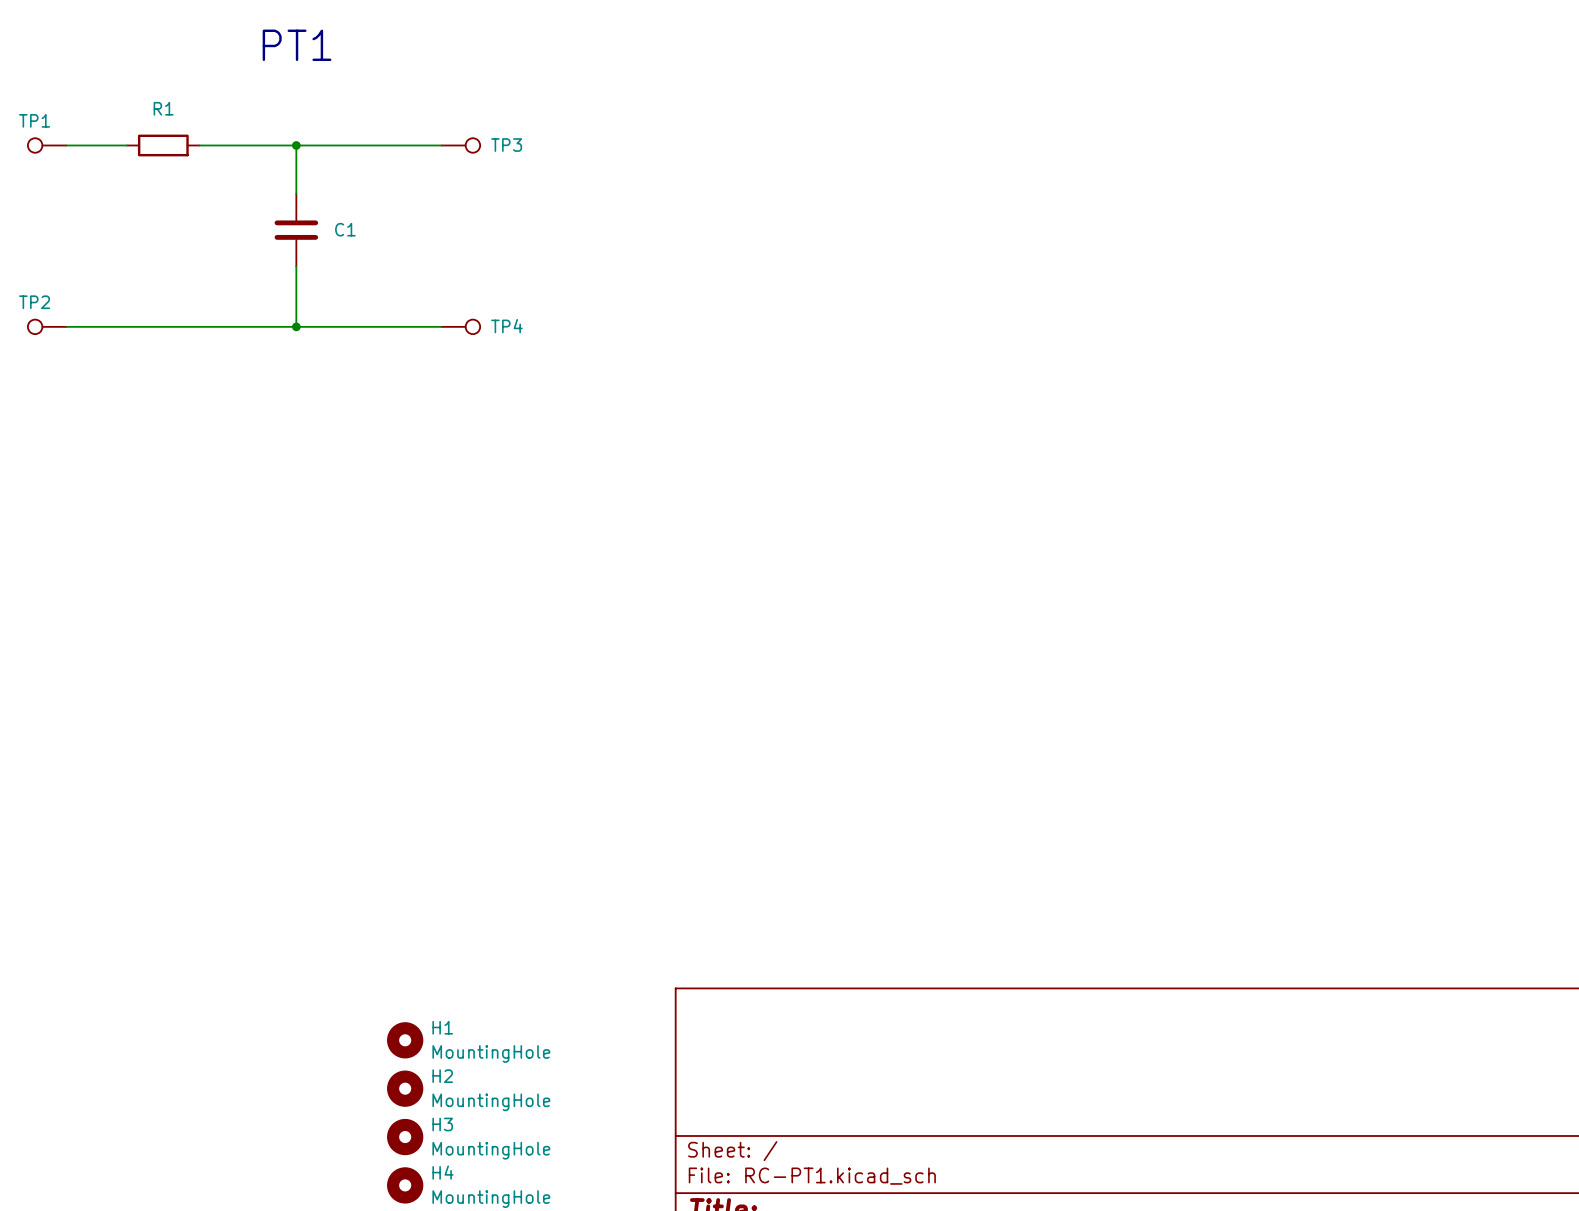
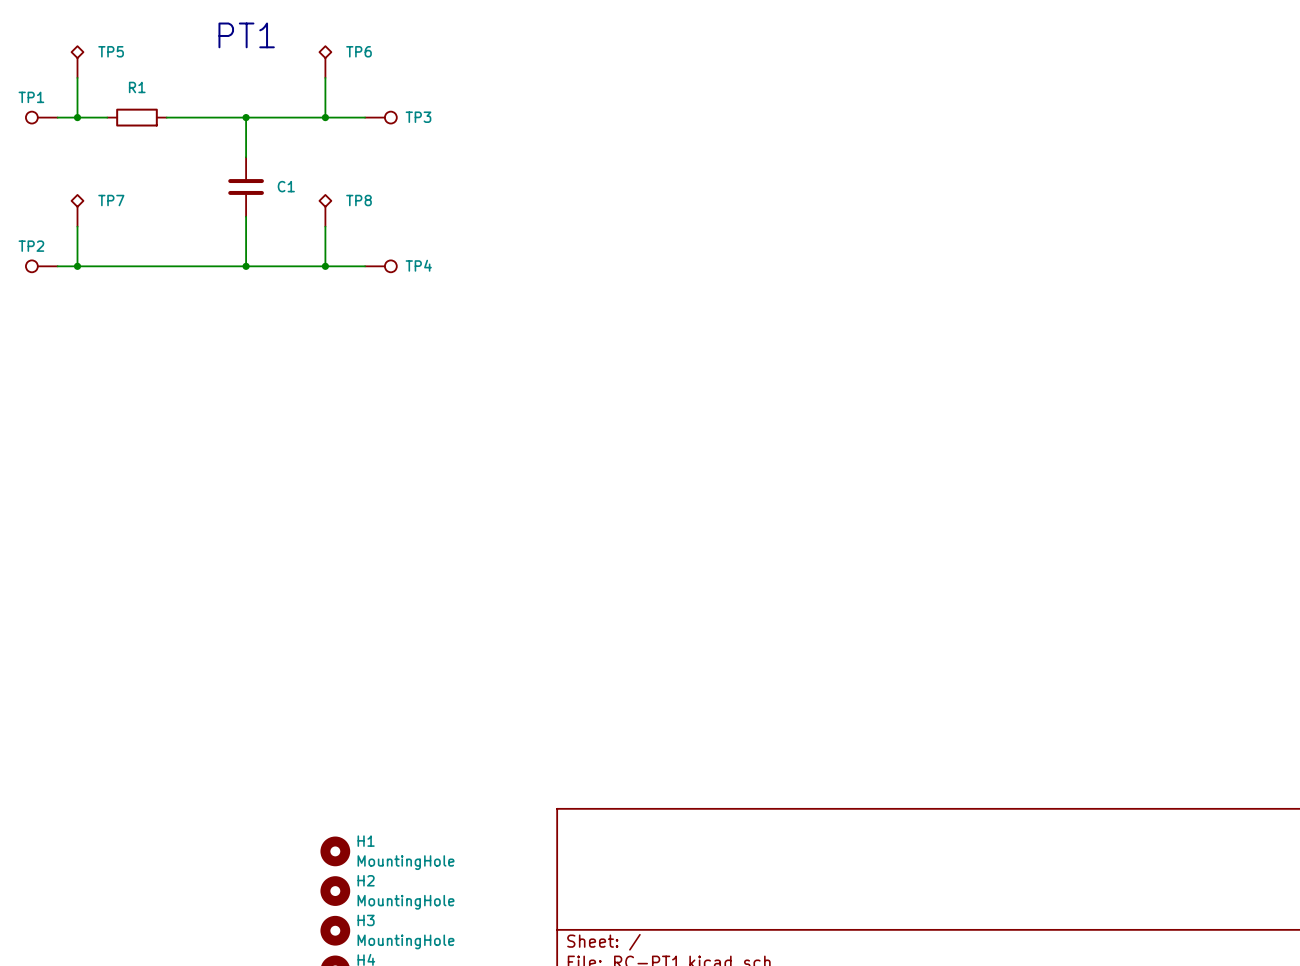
TP5: none -> (77, 62)
TP6: none -> (325, 62)
wire: none -> (77, 77) (77, 117)
wire: none -> (325, 77) (325, 117)
junction: none -> (77, 117)
junction: none -> (325, 117)
TP7: none -> (77, 210)
TP8: none -> (325, 210)
wire: none -> (77, 226) (77, 266)
wire: none -> (325, 226) (325, 266)
junction: none -> (77, 266)
junction: none -> (325, 266)

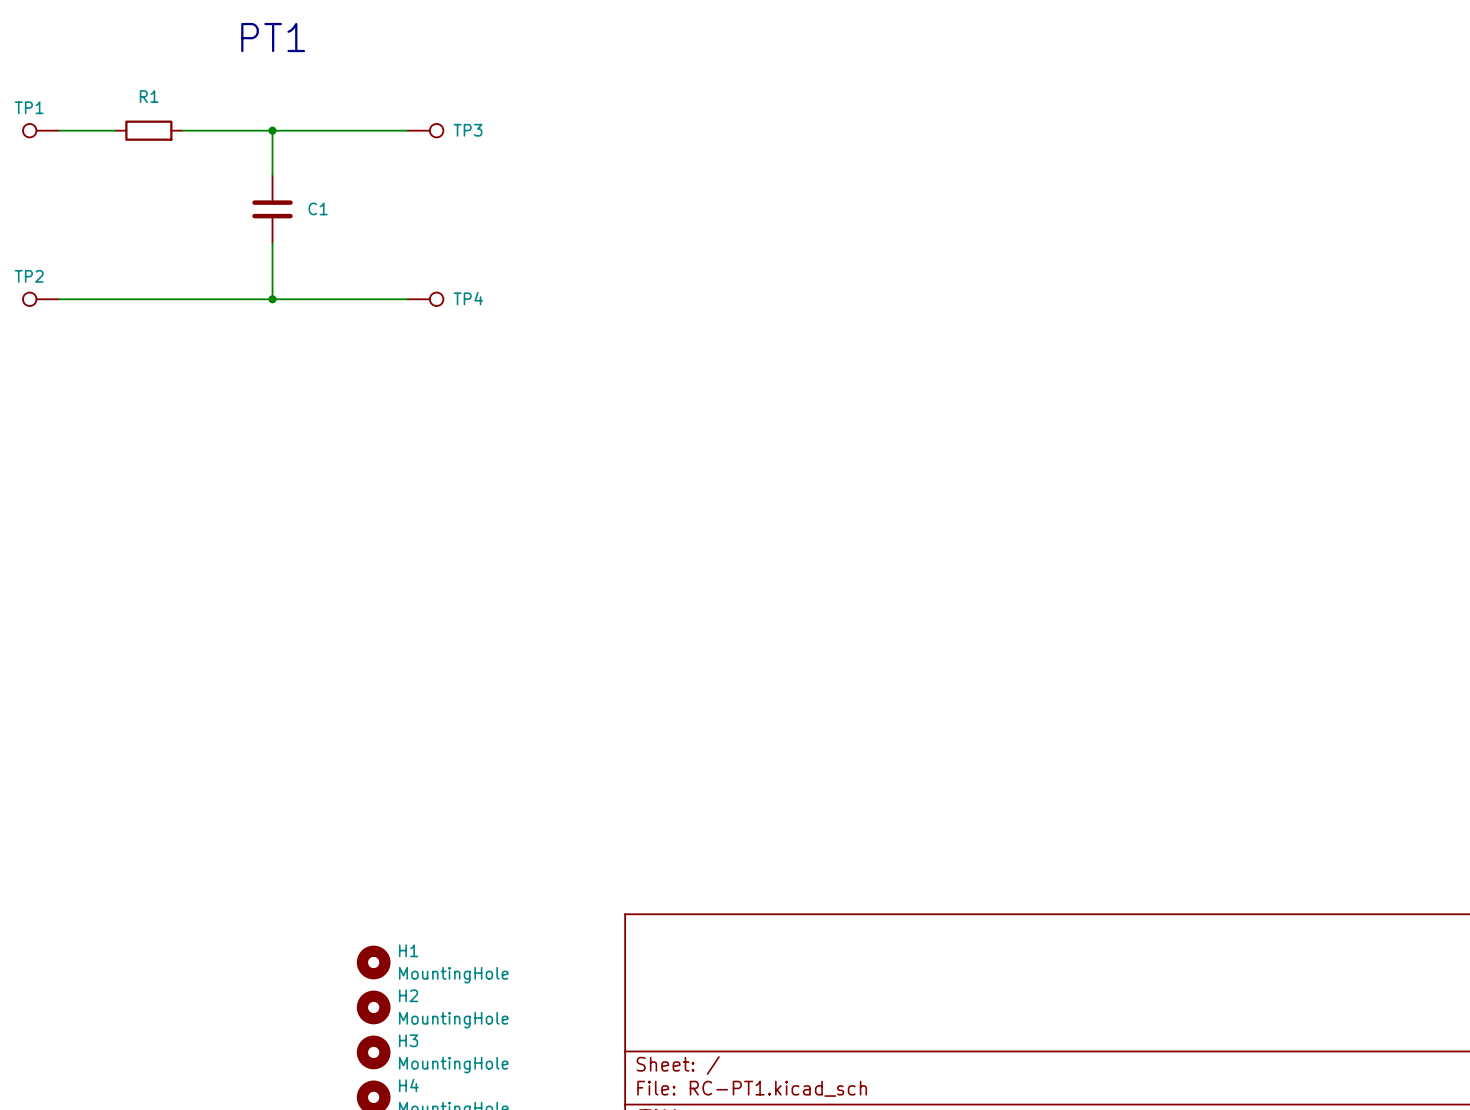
TP5: (77, 62) -> none
TP6: (325, 62) -> none
wire: (77, 77) (77, 117) -> none
wire: (325, 77) (325, 117) -> none
junction: (77, 117) -> none
junction: (325, 117) -> none
TP7: (77, 210) -> none
TP8: (325, 210) -> none
wire: (77, 226) (77, 266) -> none
wire: (325, 226) (325, 266) -> none
junction: (77, 266) -> none
junction: (325, 266) -> none

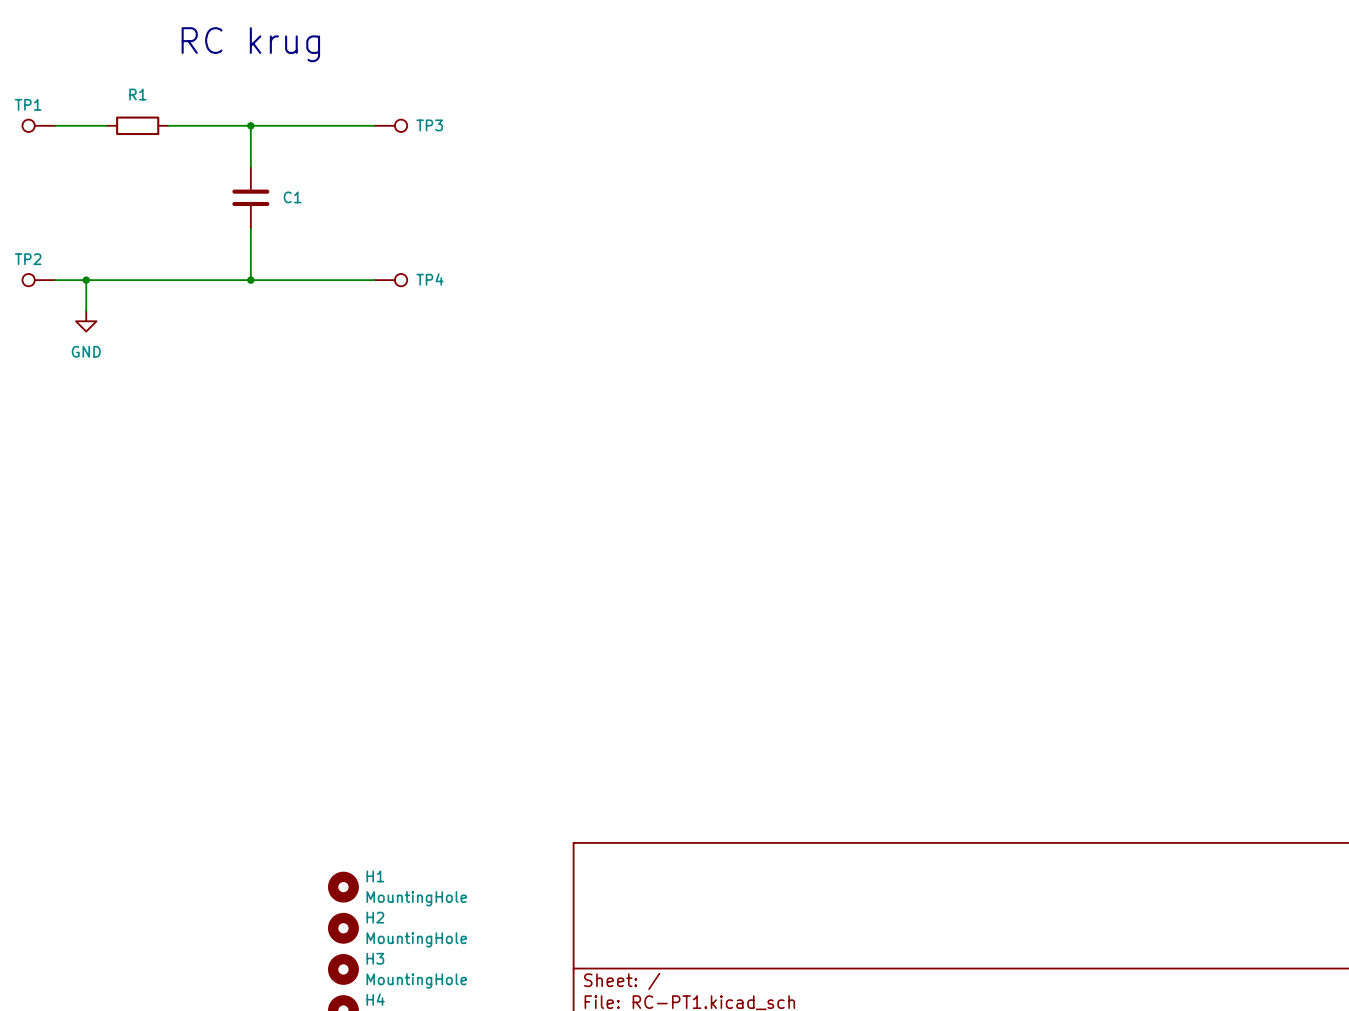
text: PT1 (273, 37) -> RC krug (250, 44)
wire: none -> (86, 280) (86, 310)
junction: none -> (86, 280)
power symbol: none -> GND (86, 321)

